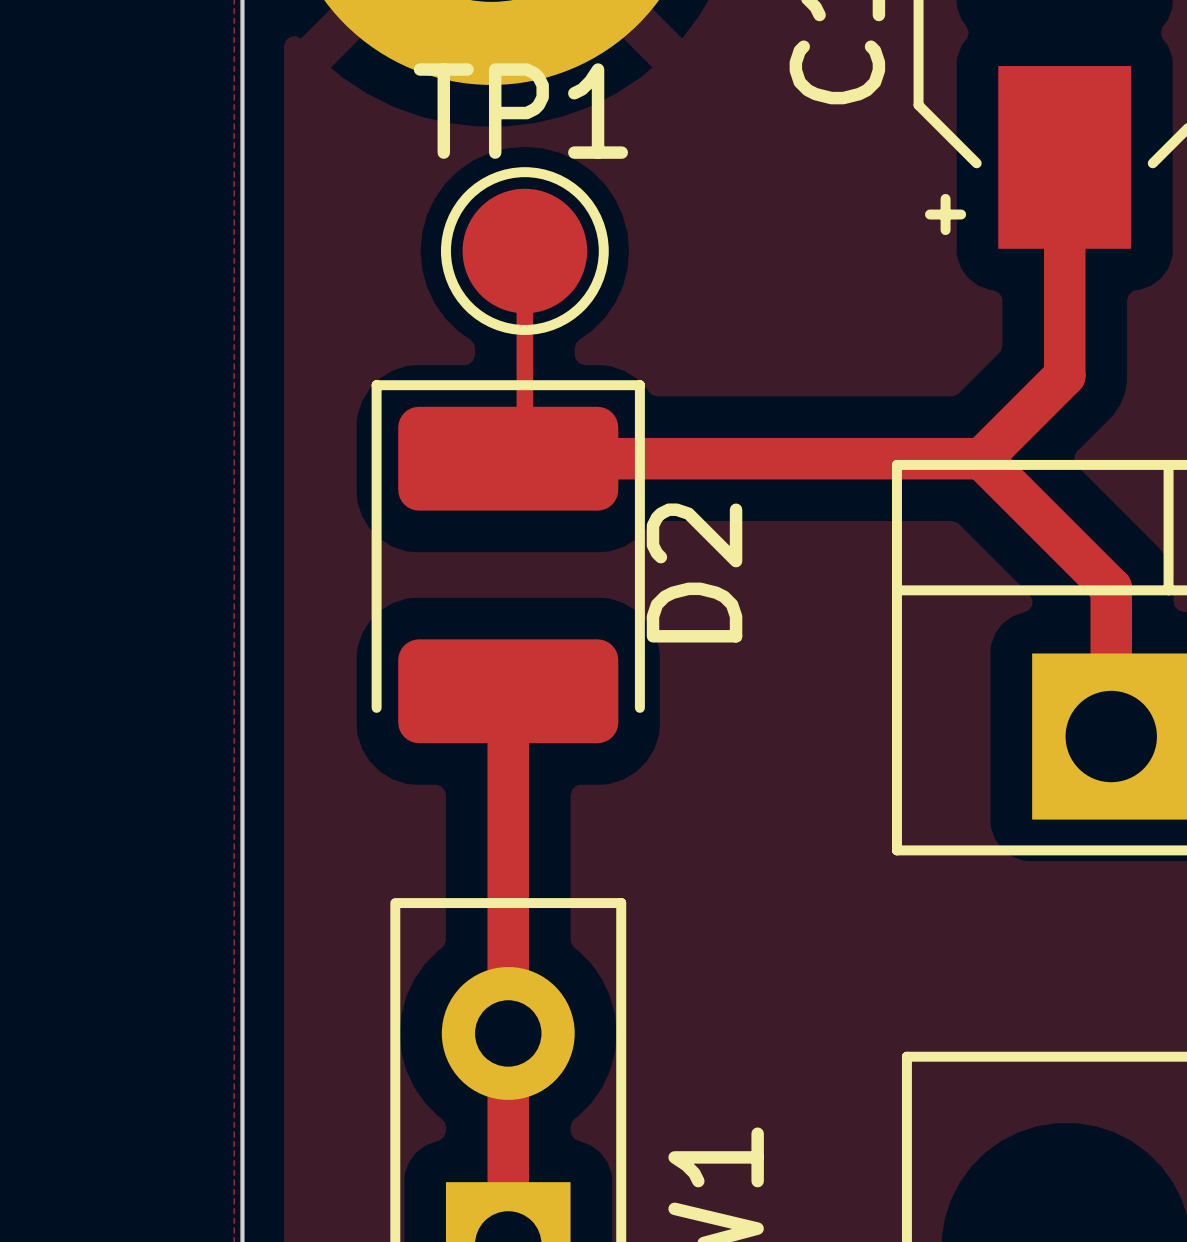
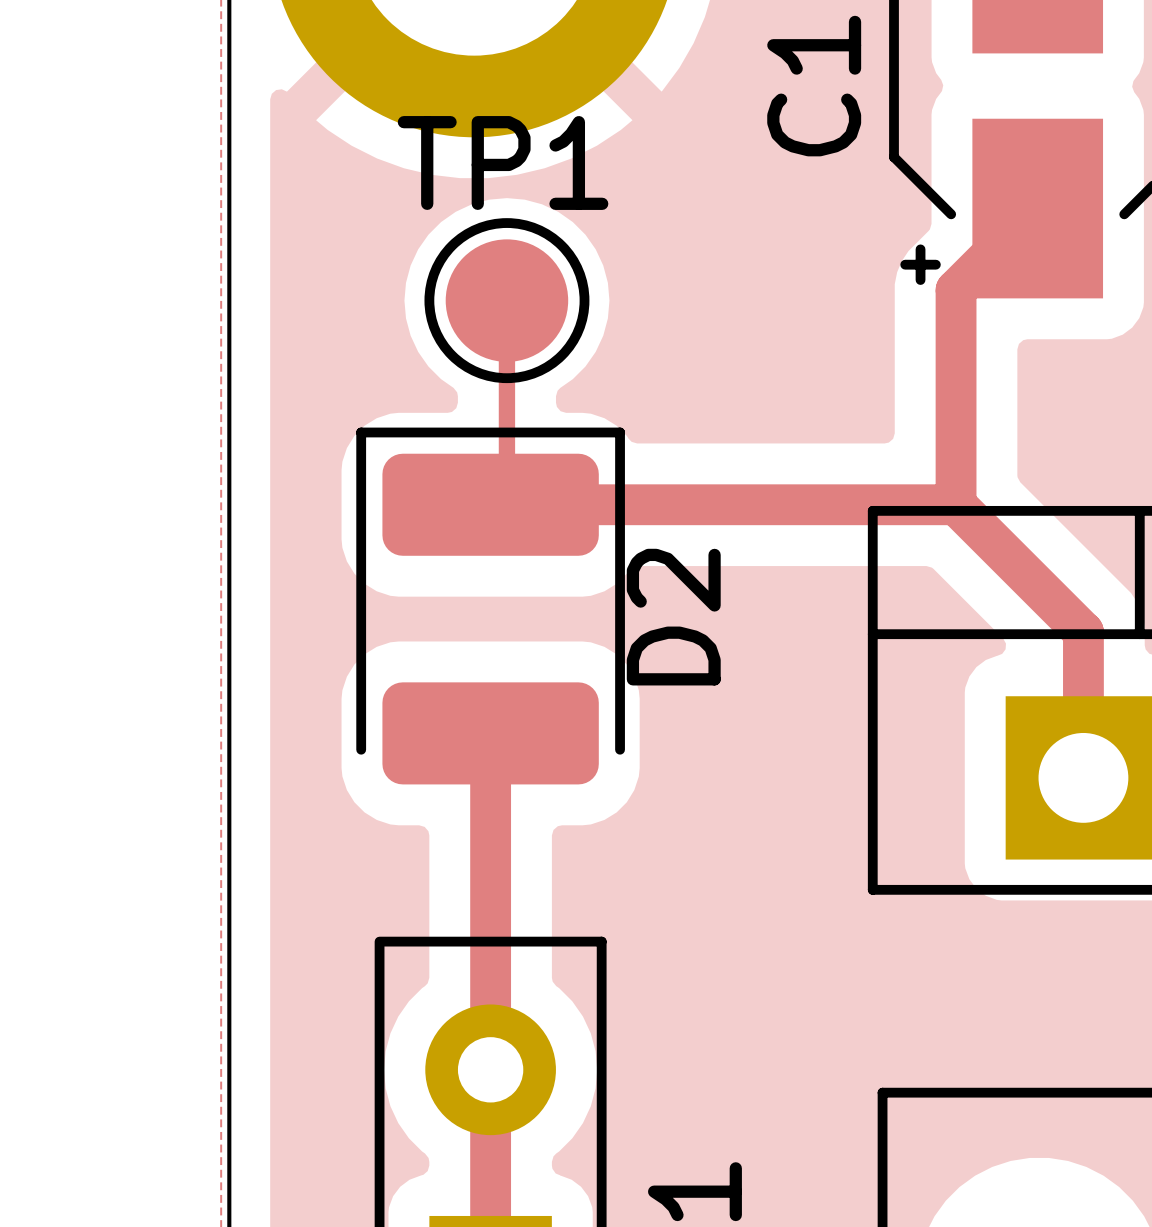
track: (1064, 157) (1064, 375) (981, 458) -> (1037, 208) (956, 290) (956, 504)

